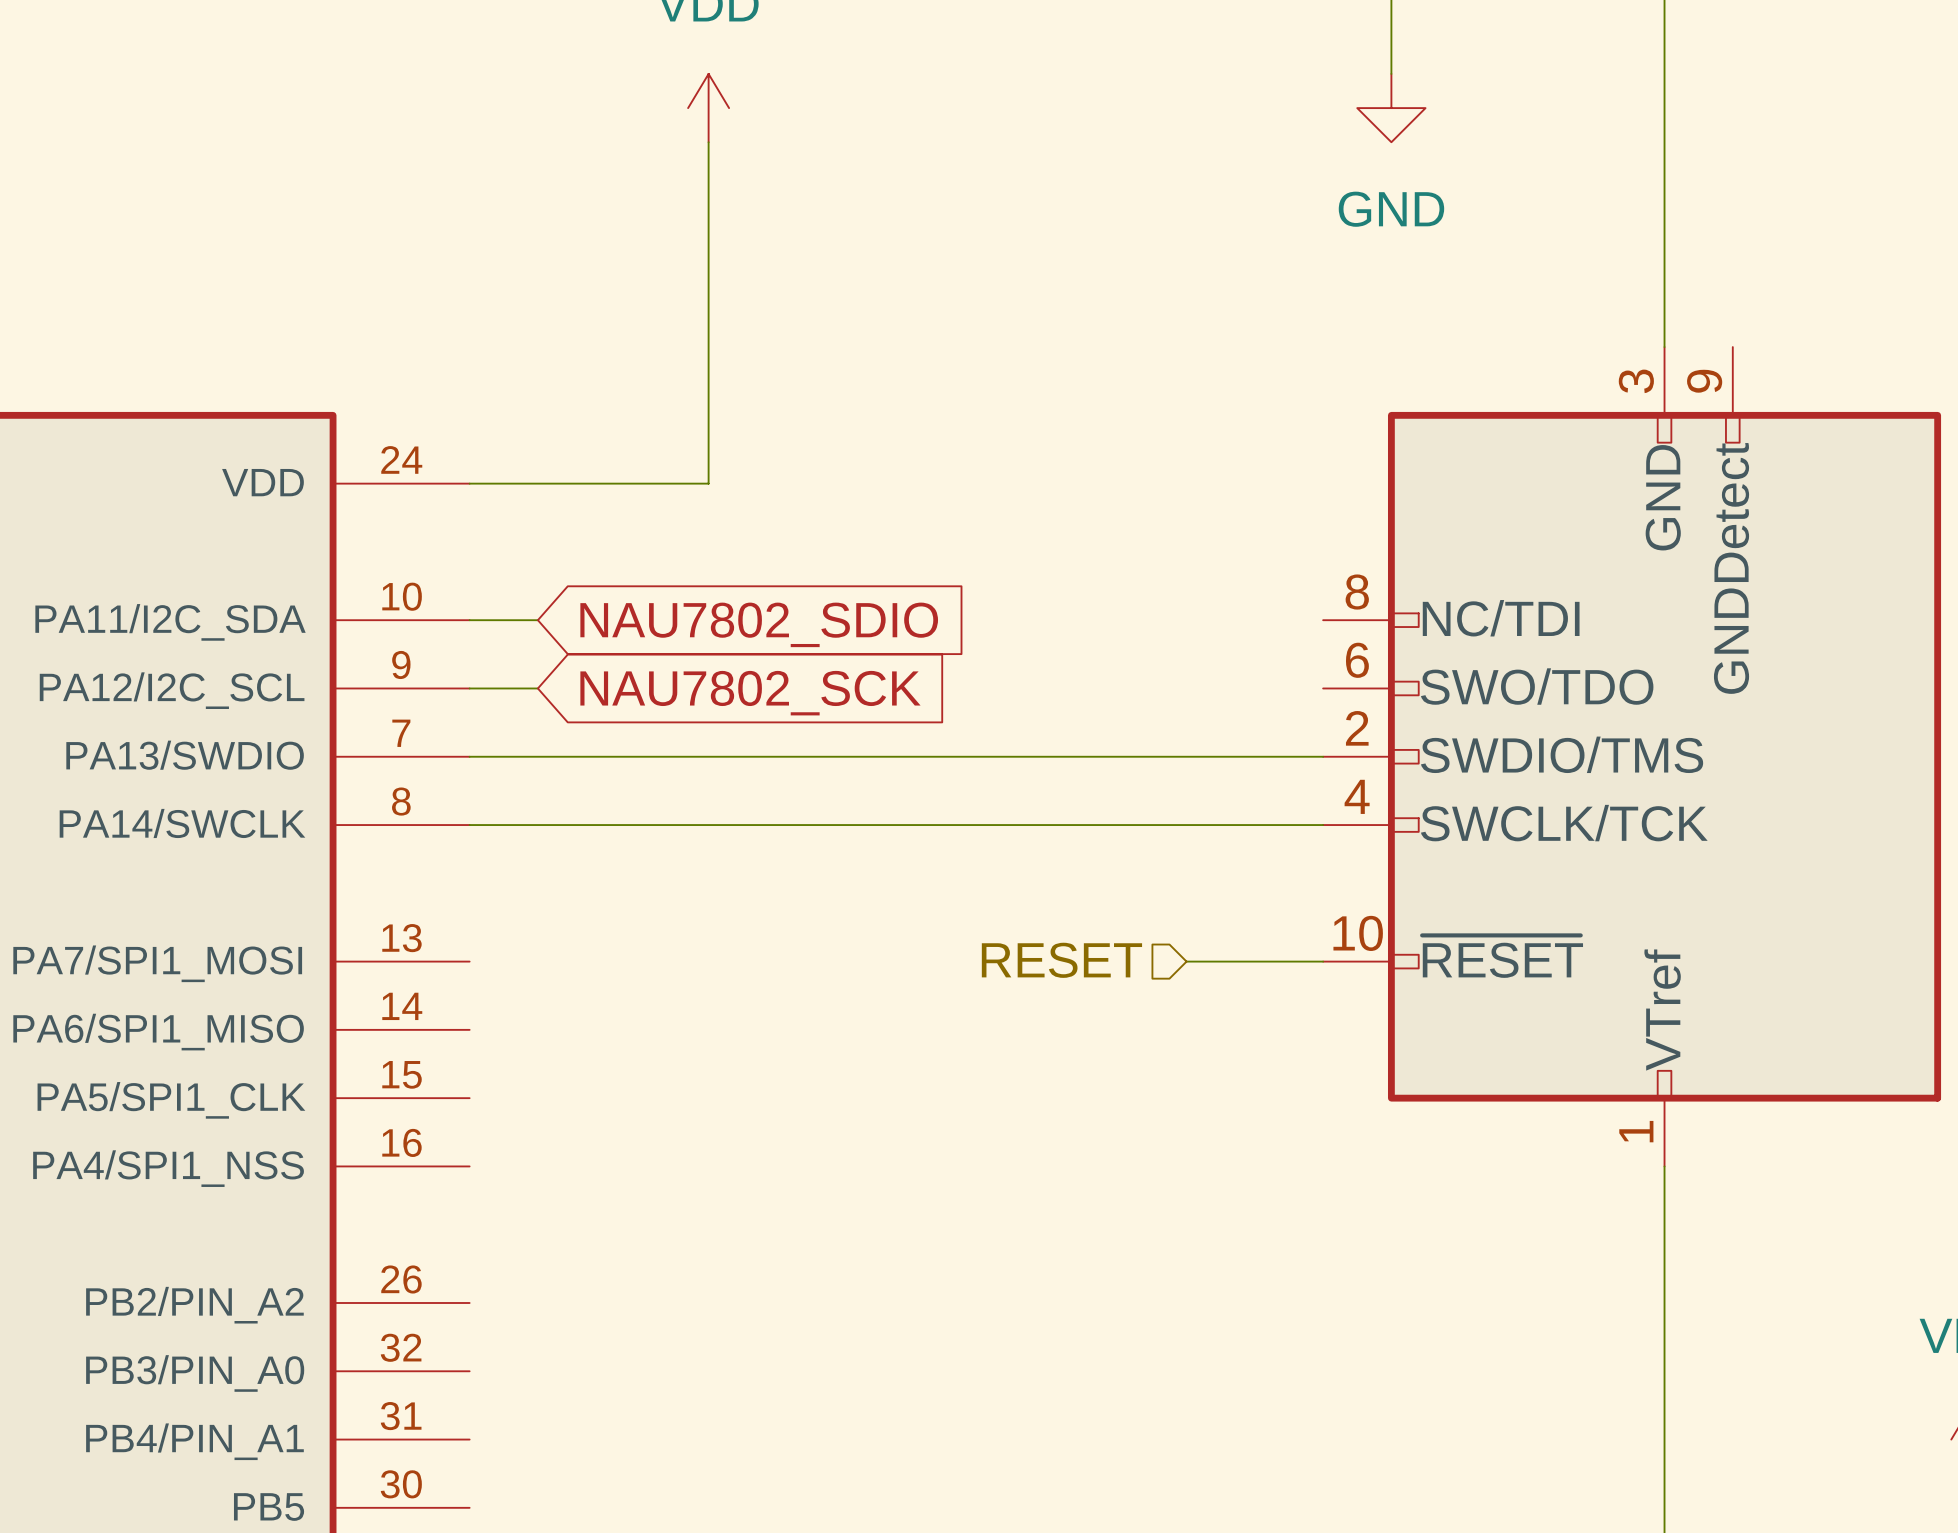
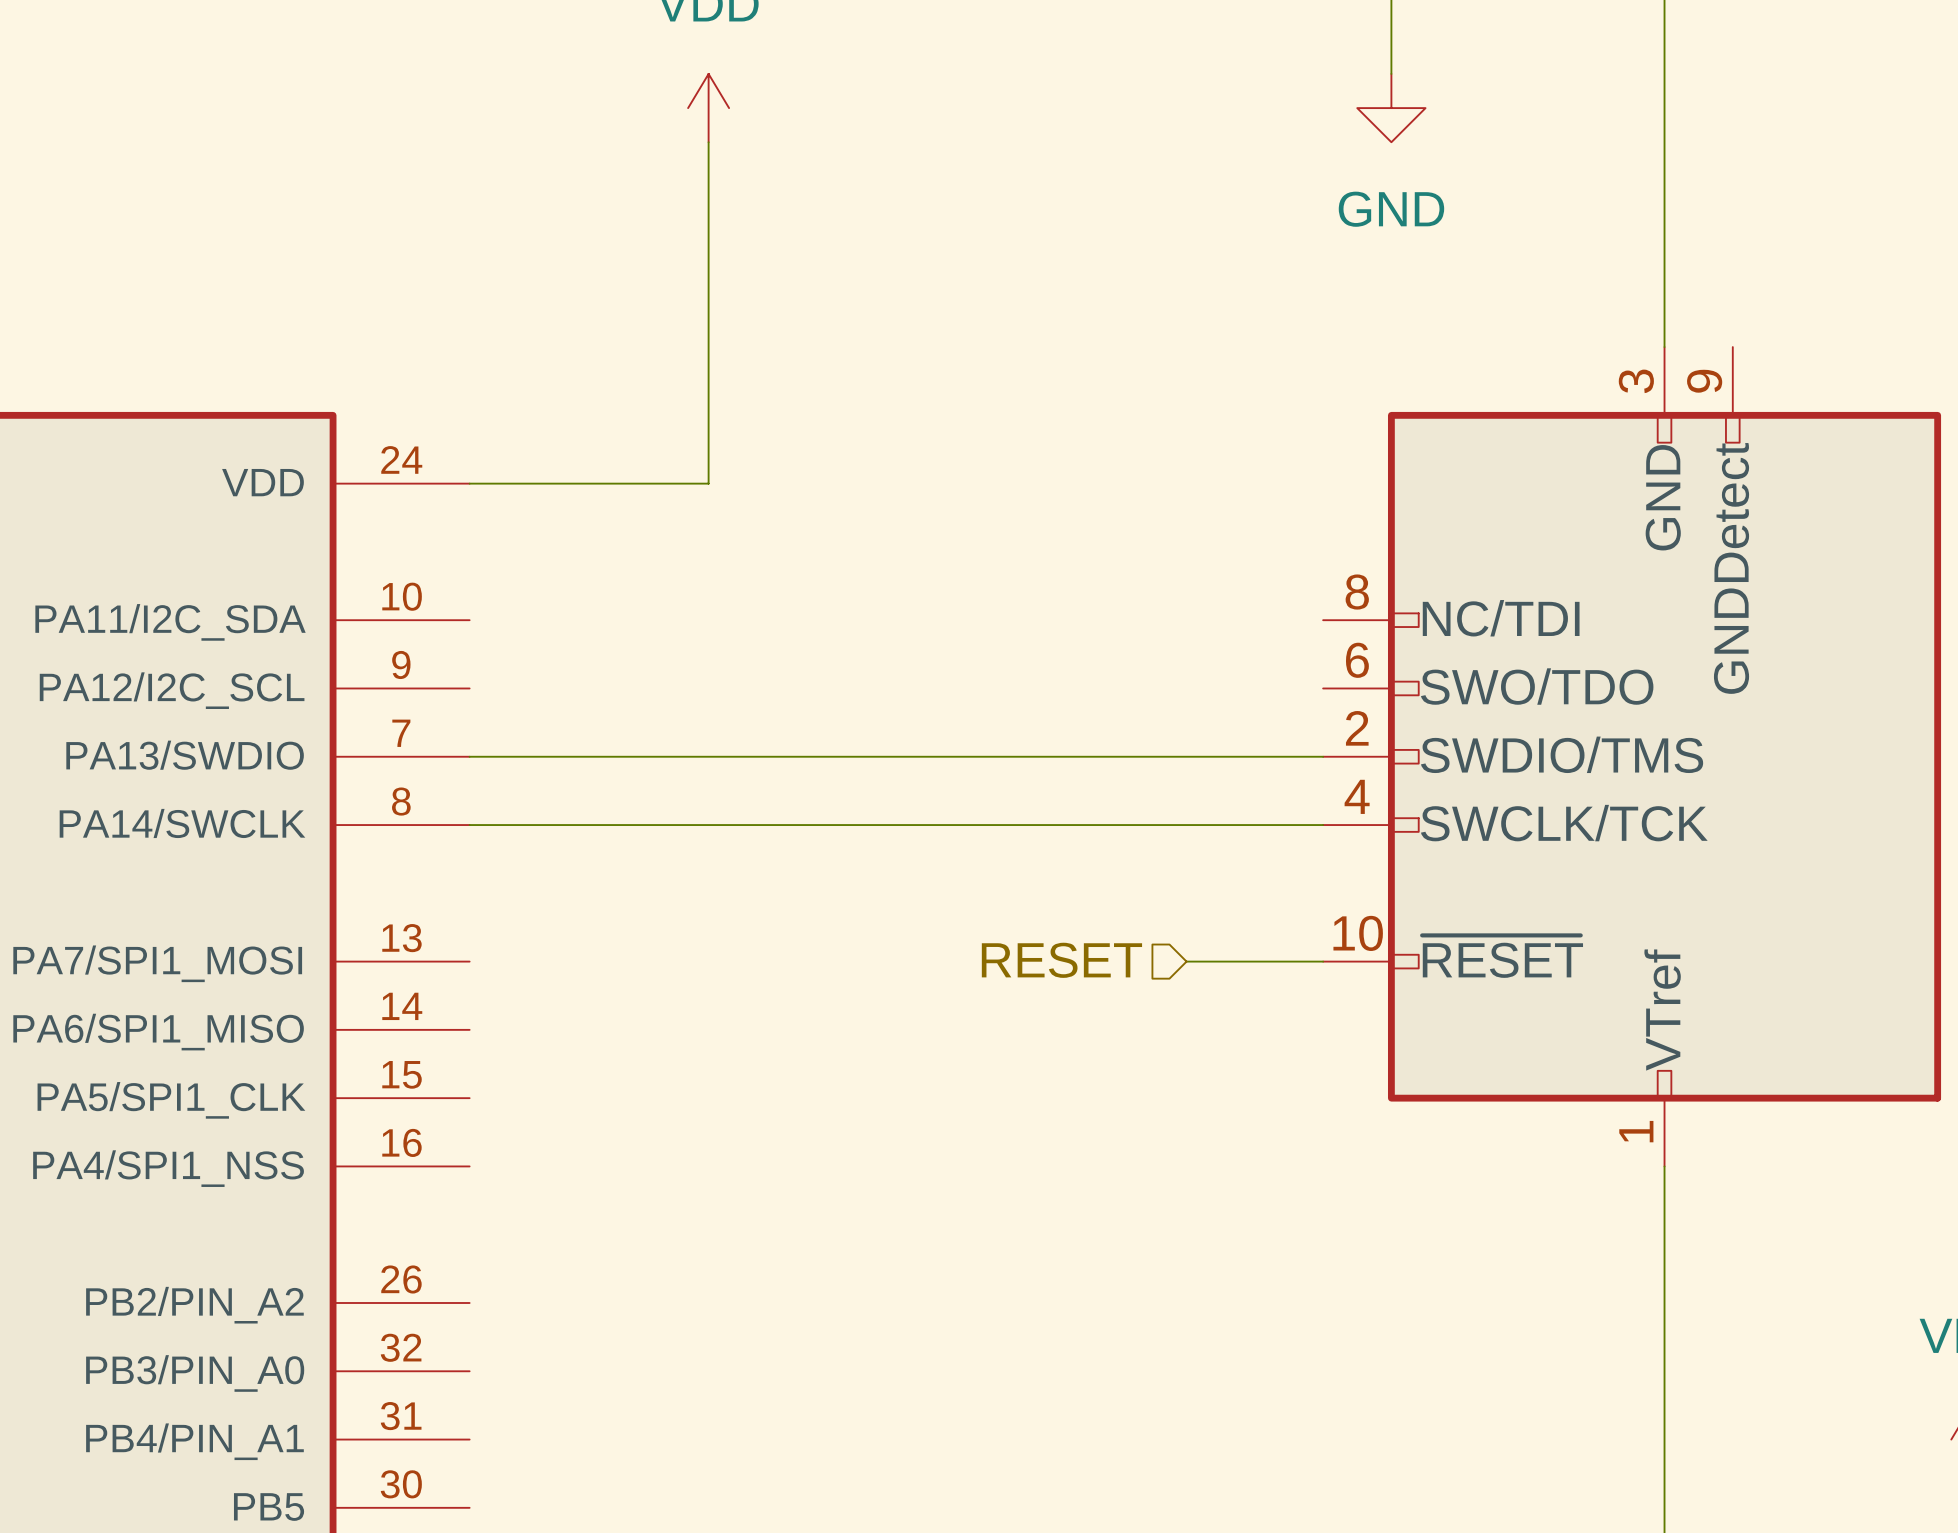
wire: (469, 620) (537, 620) -> none
global label: NAU7802_SDIO (759, 624) -> none
wire: (469, 688) (537, 688) -> none
global label: NAU7802_SCK (750, 693) -> none

